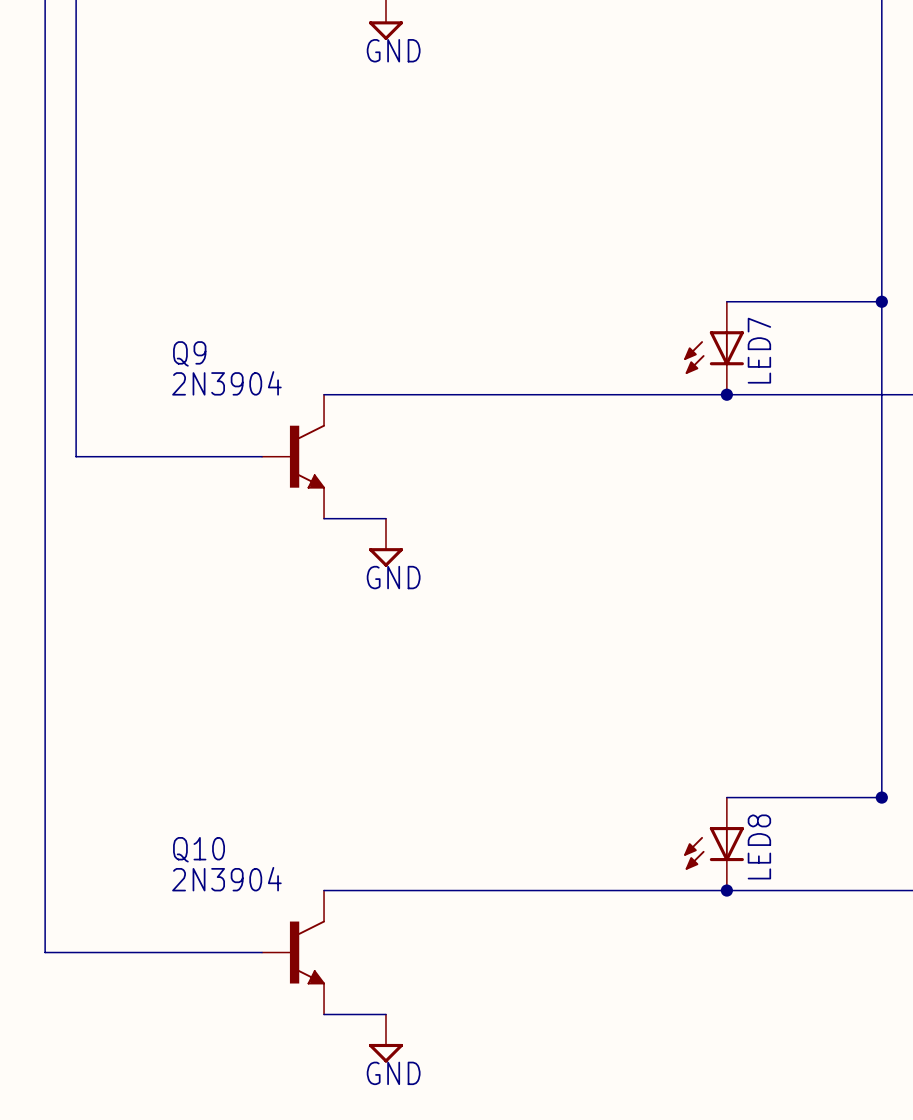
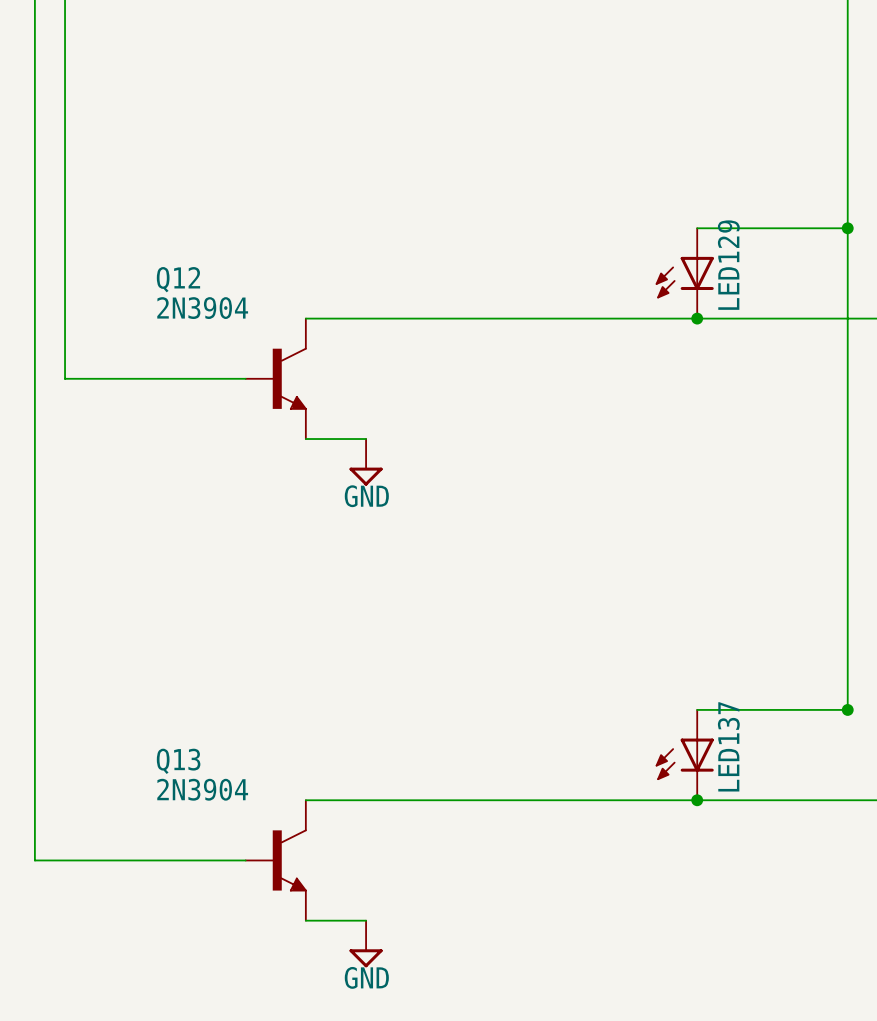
LED7 name: LED7 (759, 350) -> LED129 (728, 265)
Q9 name: Q9 (189, 353) -> Q12 (178, 279)
LED8 name: LED8 (759, 846) -> LED137 (728, 746)
Q10 name: Q10 (199, 849) -> Q13 (178, 761)

